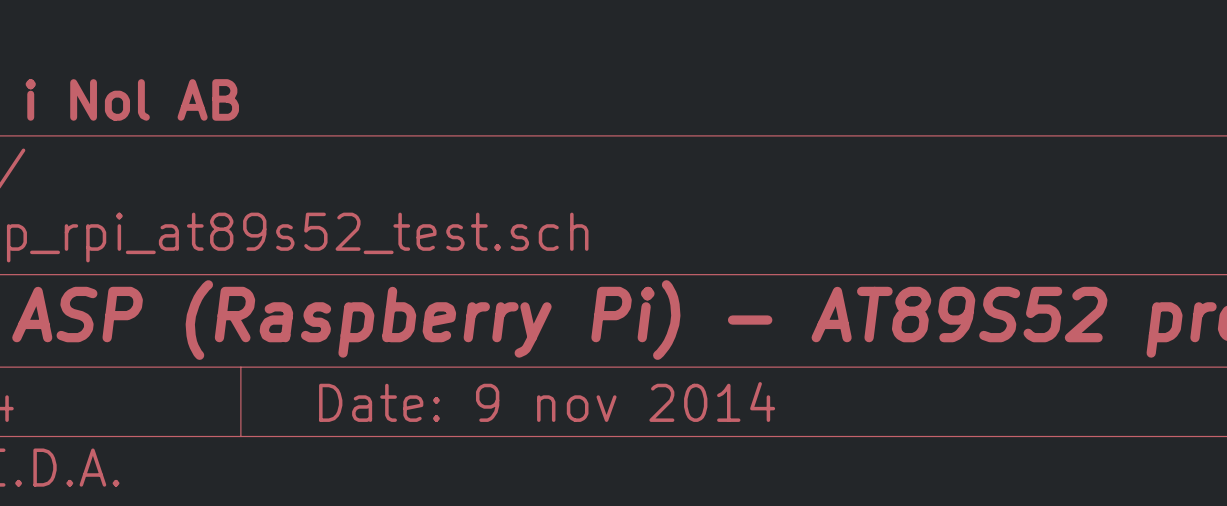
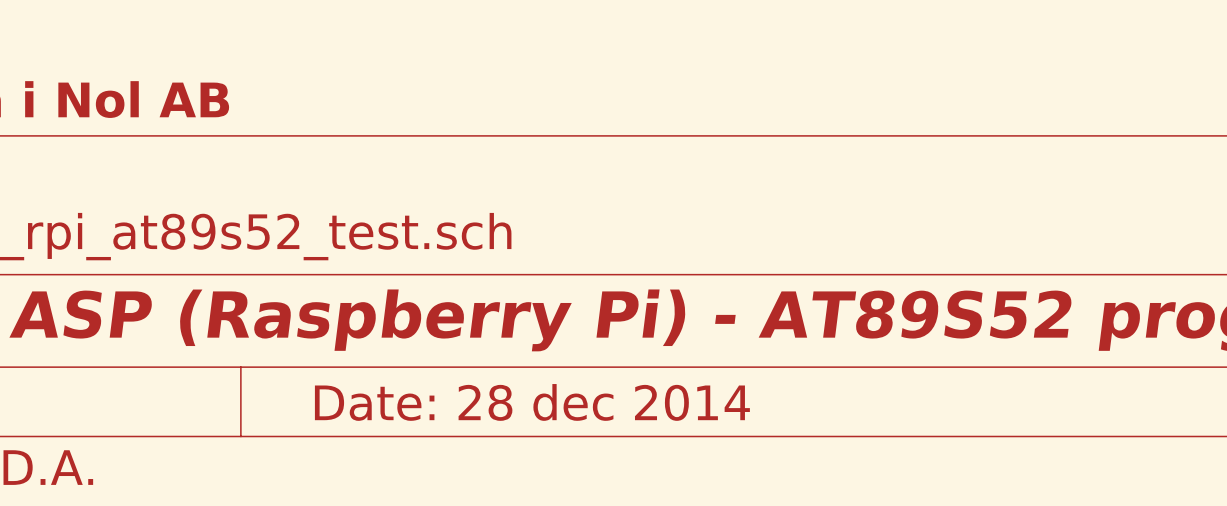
title block: Date: 9 nov 2014 (547, 402) -> Date: 28 dec 2014 (532, 402)

